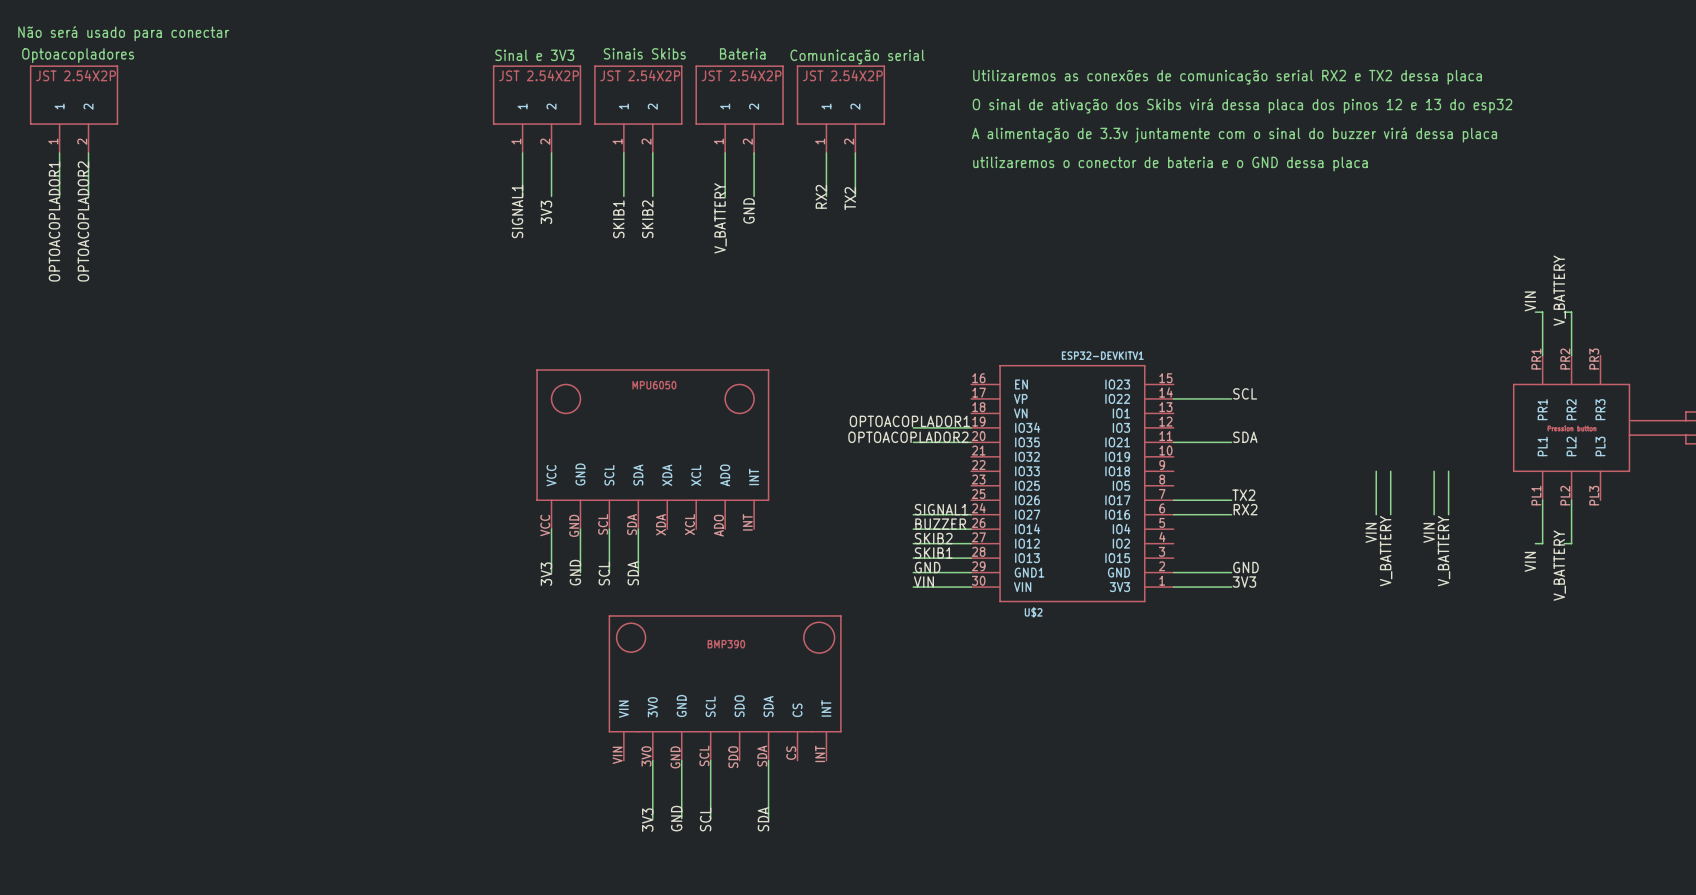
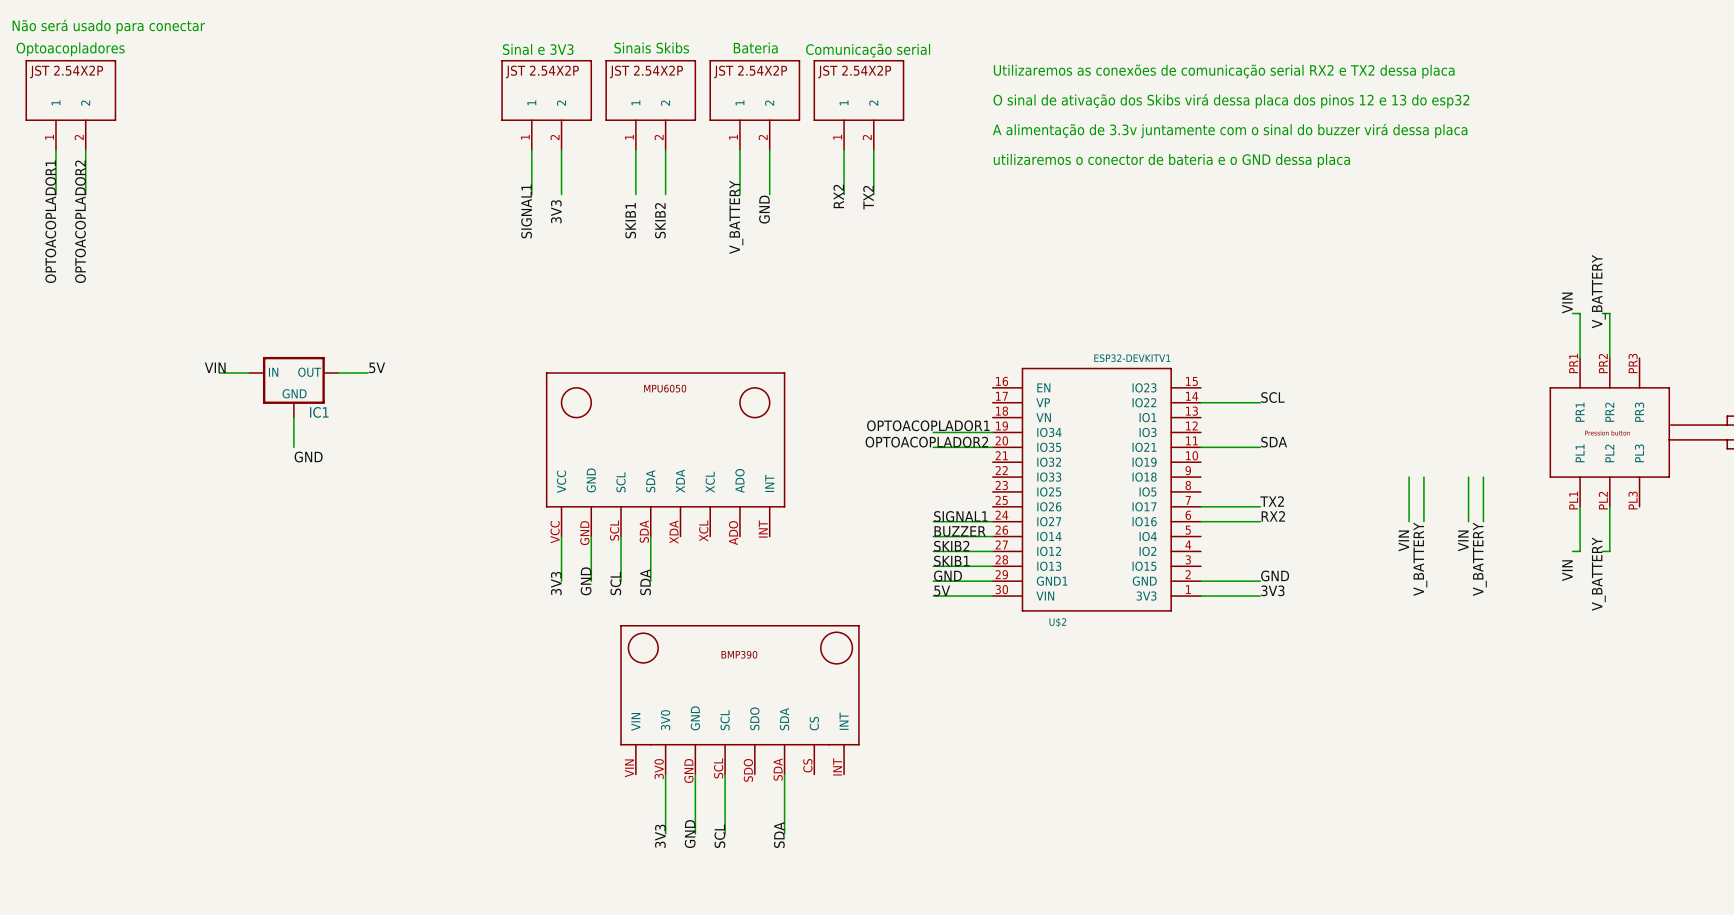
label: none -> VIN (215, 367)
label: none -> 5V (377, 367)
wire: none -> (219, 372) (249, 372)
wire: none -> (338, 372) (368, 372)
IC1: none -> (293, 387)
wire: none -> (293, 417) (293, 447)
label: none -> GND (308, 457)
label: VIN (923, 581) -> 5V (942, 590)

